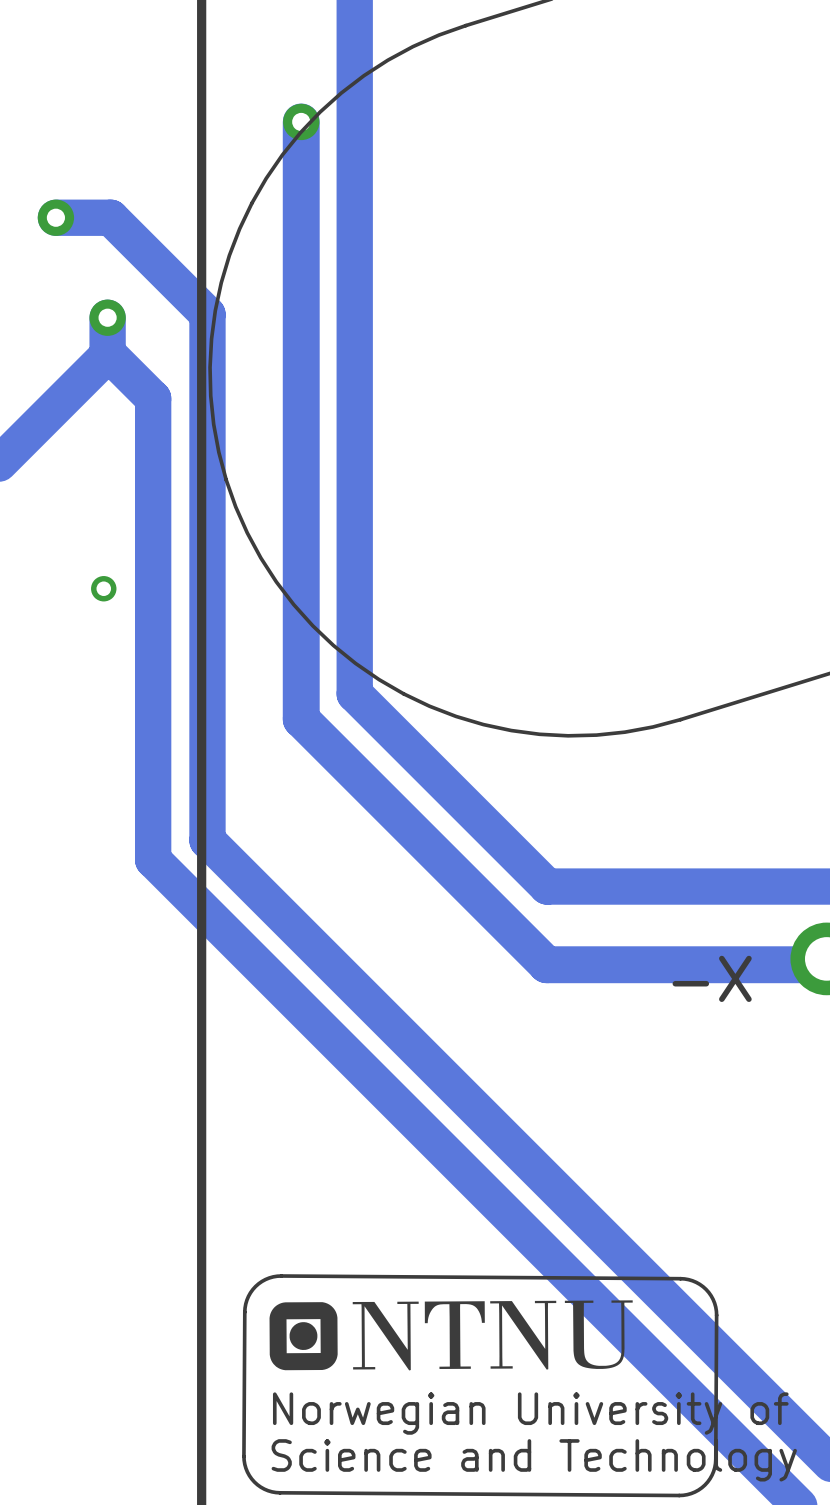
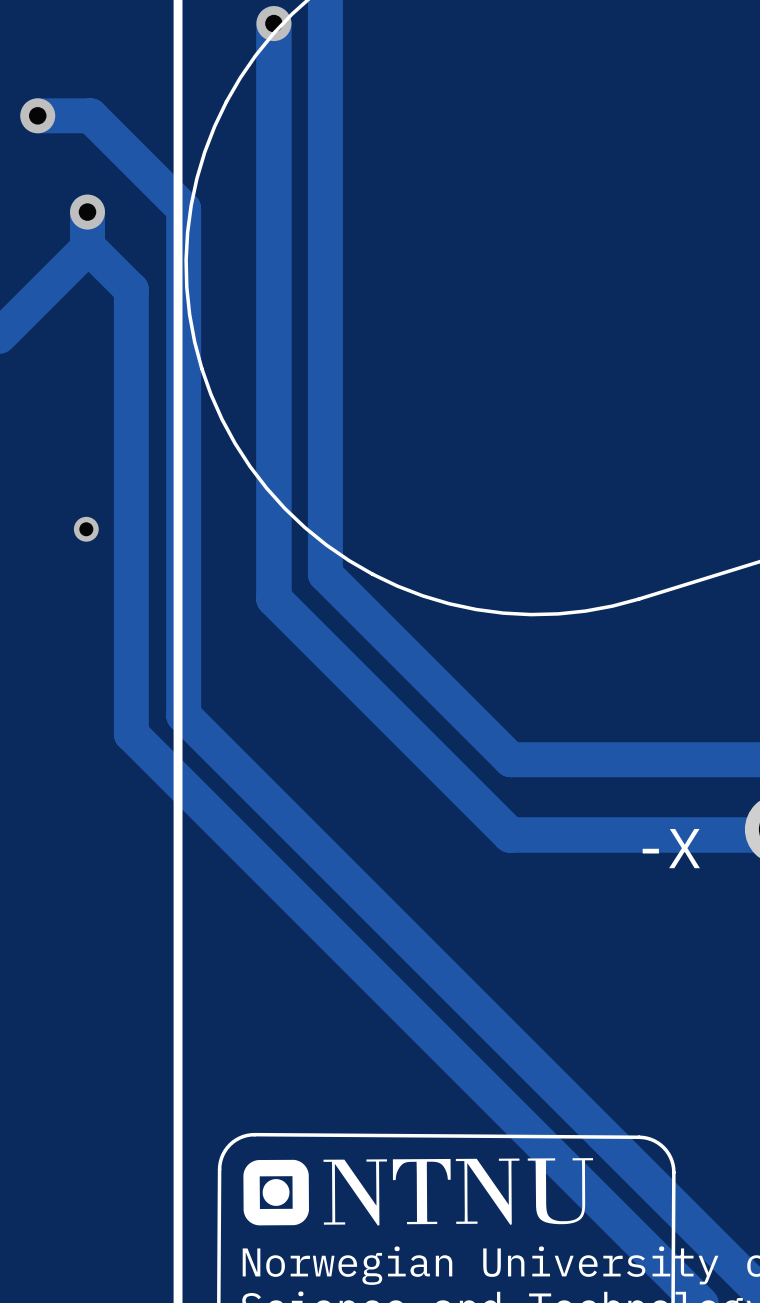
via position: (103, 588) -> (86, 529)

